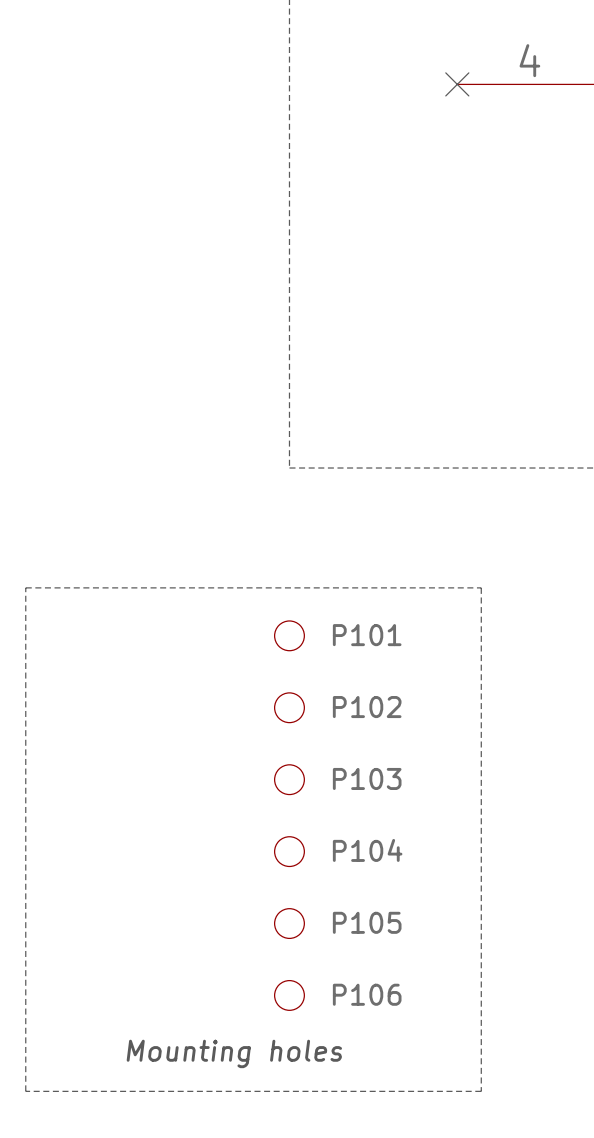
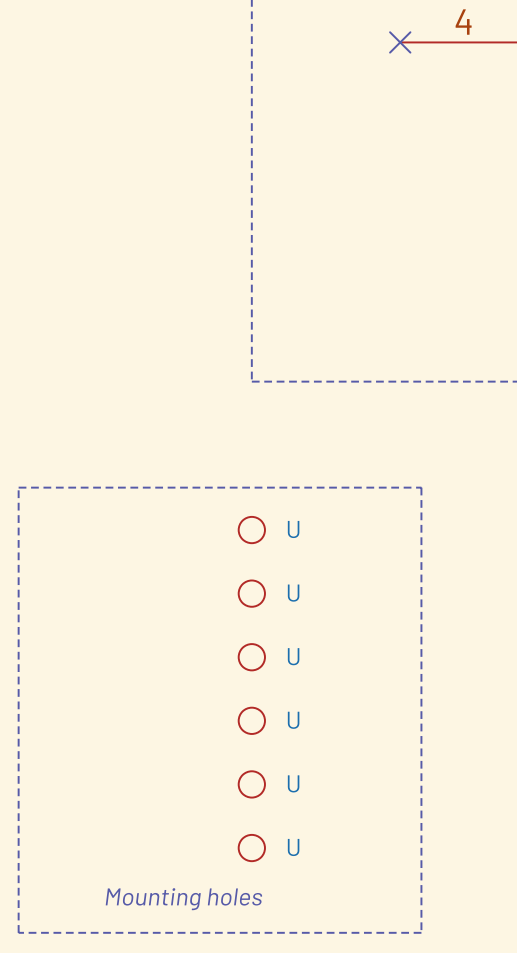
P101 name: P101 (367, 635) -> U (293, 529)
P102 name: P102 (367, 707) -> U (293, 593)
P103 name: P103 (367, 778) -> U (293, 656)
P104 name: P104 (367, 850) -> U (293, 720)
P105 name: P105 (367, 922) -> U (293, 783)
P106 name: P106 (367, 994) -> U (293, 847)

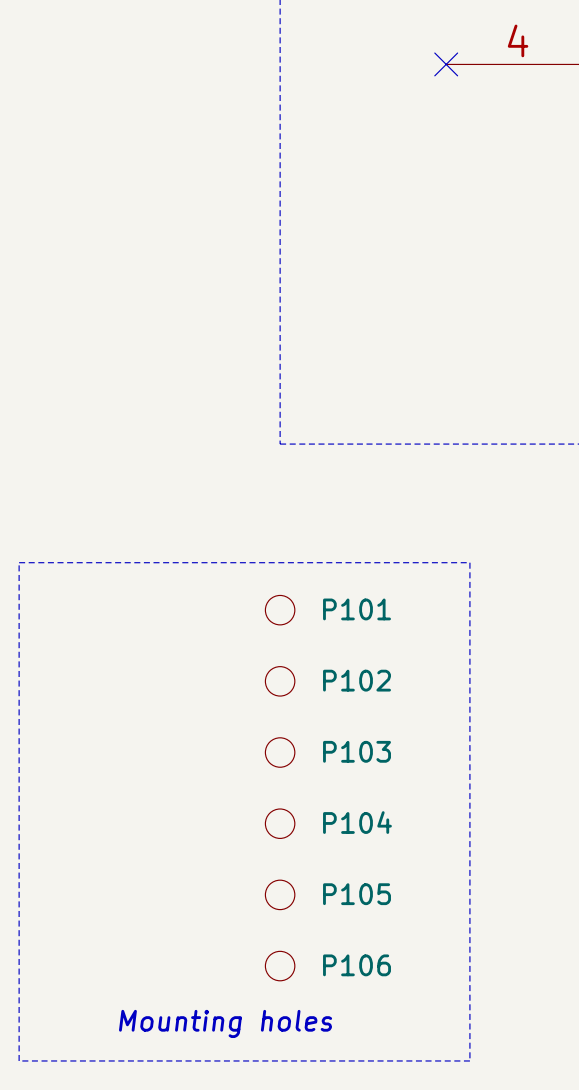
U name: U (293, 529) -> P101 (357, 609)
U name: U (293, 593) -> P102 (357, 680)
U name: U (293, 656) -> P103 (357, 751)
U name: U (293, 720) -> P104 (357, 822)
U name: U (293, 783) -> P105 (357, 894)
U name: U (293, 847) -> P106 (357, 965)

